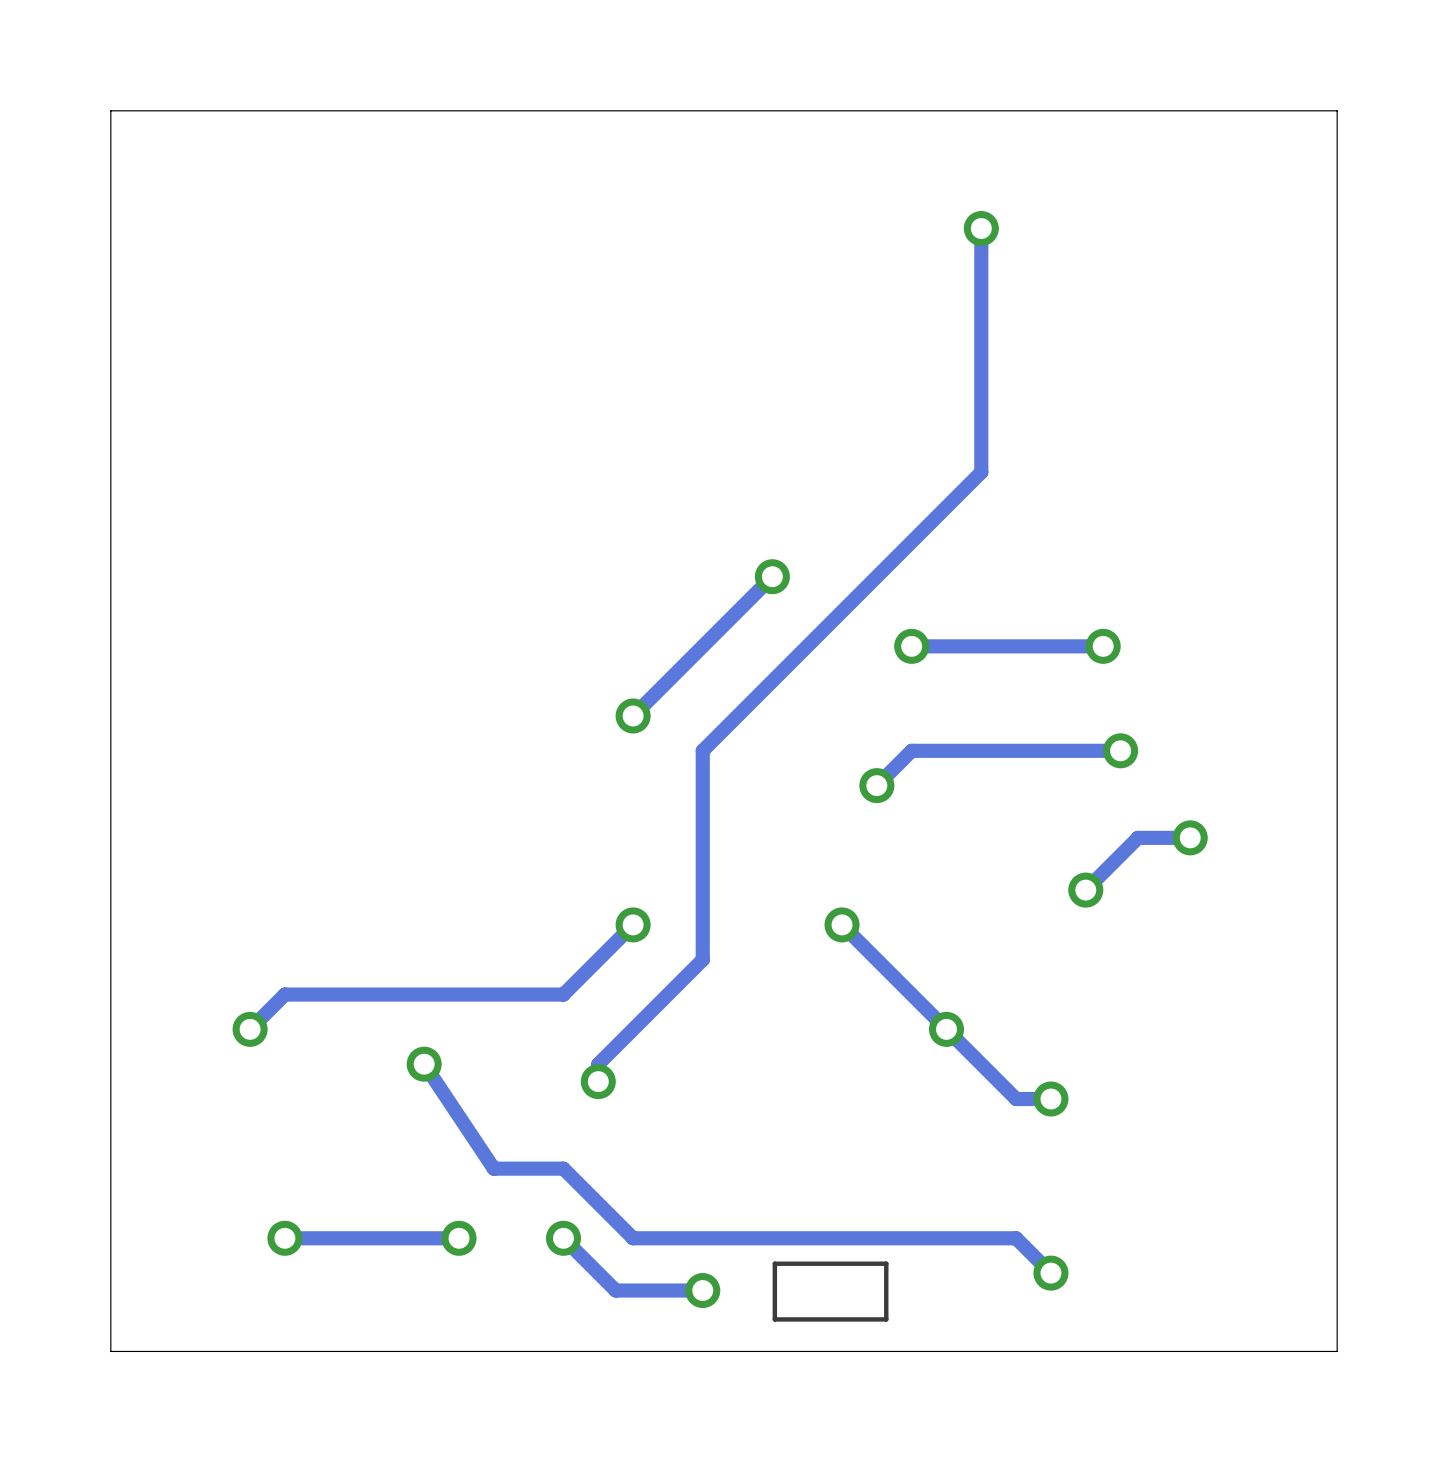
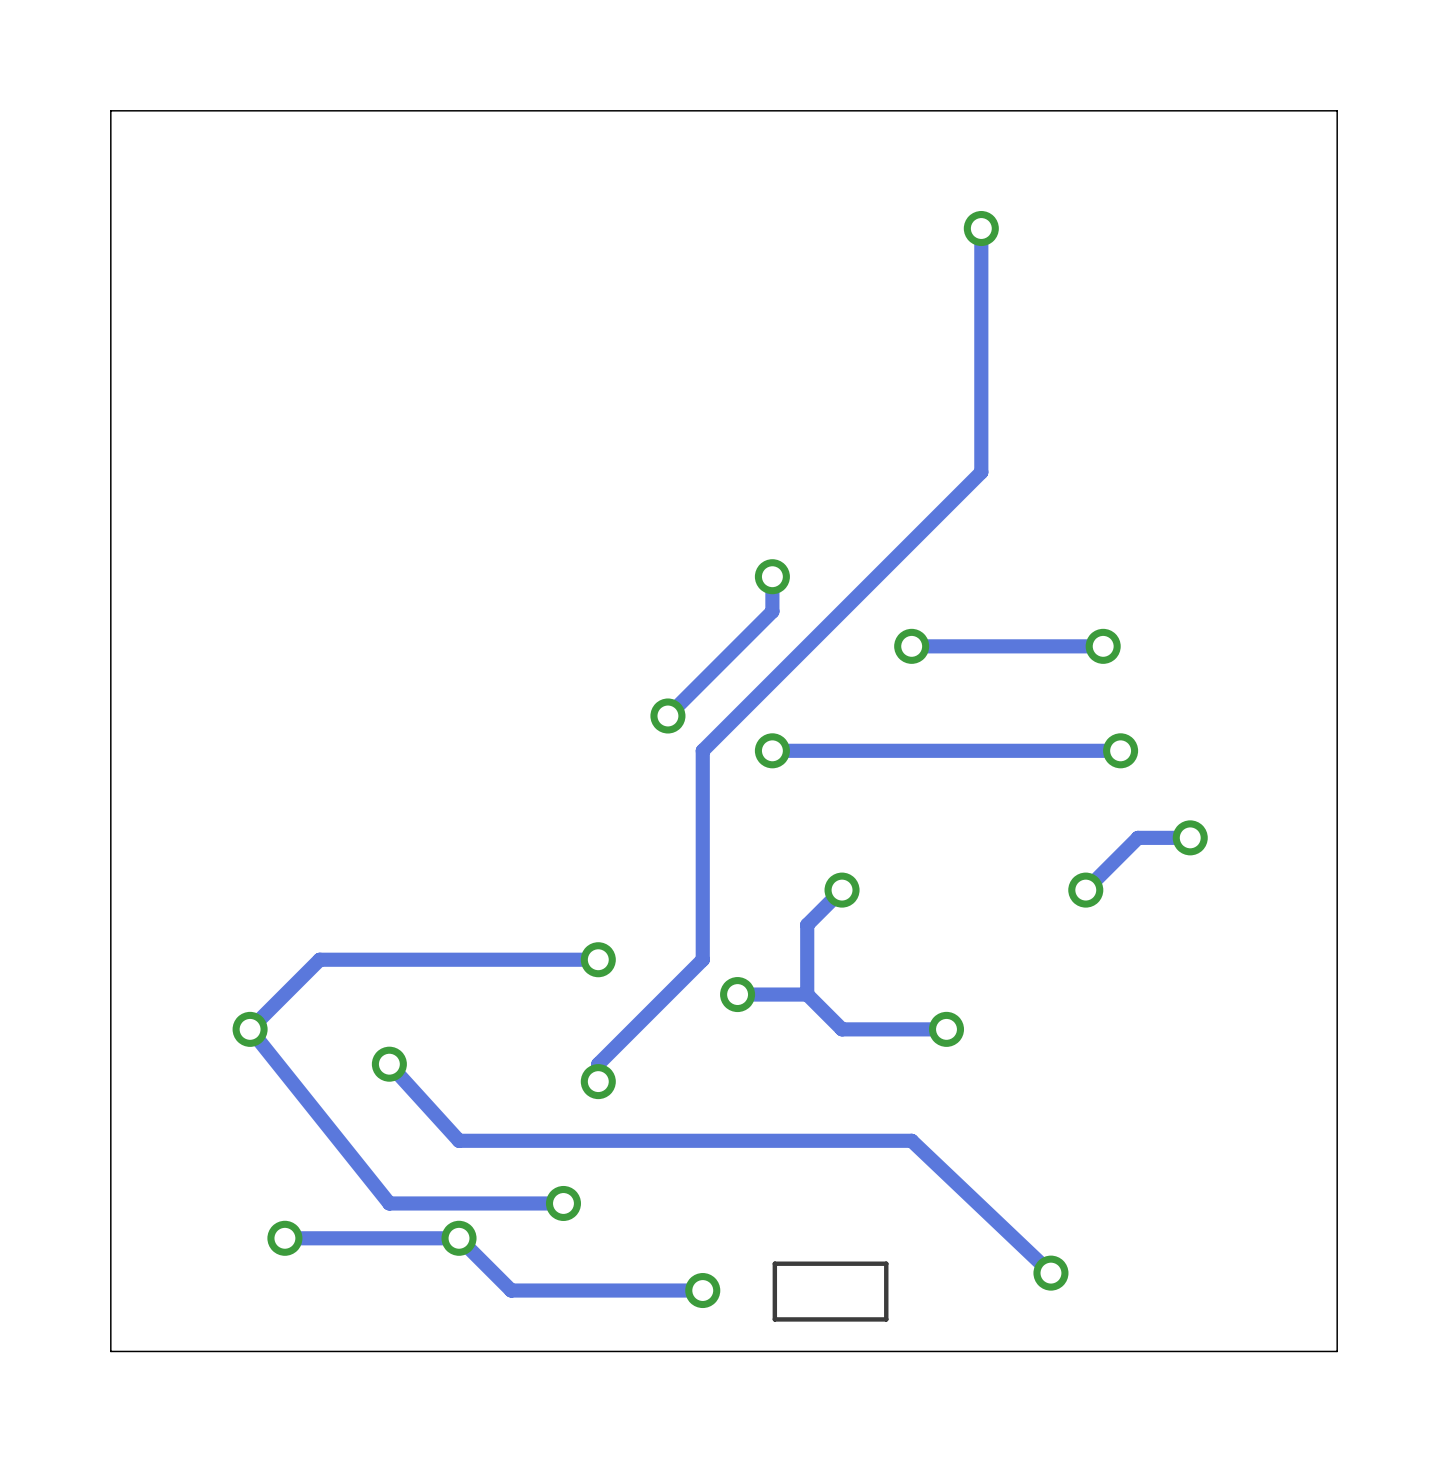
track: (772, 576) (633, 715) -> (772, 576) (772, 611) (667, 715)
via position: (633, 715) -> (667, 715)
via: none -> (772, 750)
track: (911, 750) (876, 785) -> (911, 750) (772, 750)
via: (876, 785) -> none
track: none -> (842, 890) (807, 924) (807, 994)
track: (633, 924) (563, 994) (284, 994) -> (598, 959) (319, 959) (284, 994)
via position: (633, 924) -> (598, 959)
track: (842, 924) (1016, 1099) (1050, 1099) -> none
via position: (842, 924) -> (842, 890)
via: none -> (737, 994)
track: none -> (807, 994) (737, 994)
track: none -> (807, 994) (842, 1029) (946, 1029)
track: none -> (250, 1029) (389, 1203) (563, 1203)
track: (424, 1064) (493, 1168) (563, 1168) (633, 1238) (1016, 1238) (1050, 1273) -> (389, 1064) (459, 1140) (911, 1140) (1050, 1273)
via position: (424, 1064) -> (389, 1064)
via: (1050, 1099) -> none
track: (563, 1238) (615, 1290) -> (459, 1238) (511, 1290) (615, 1290)
via position: (563, 1238) -> (563, 1203)

